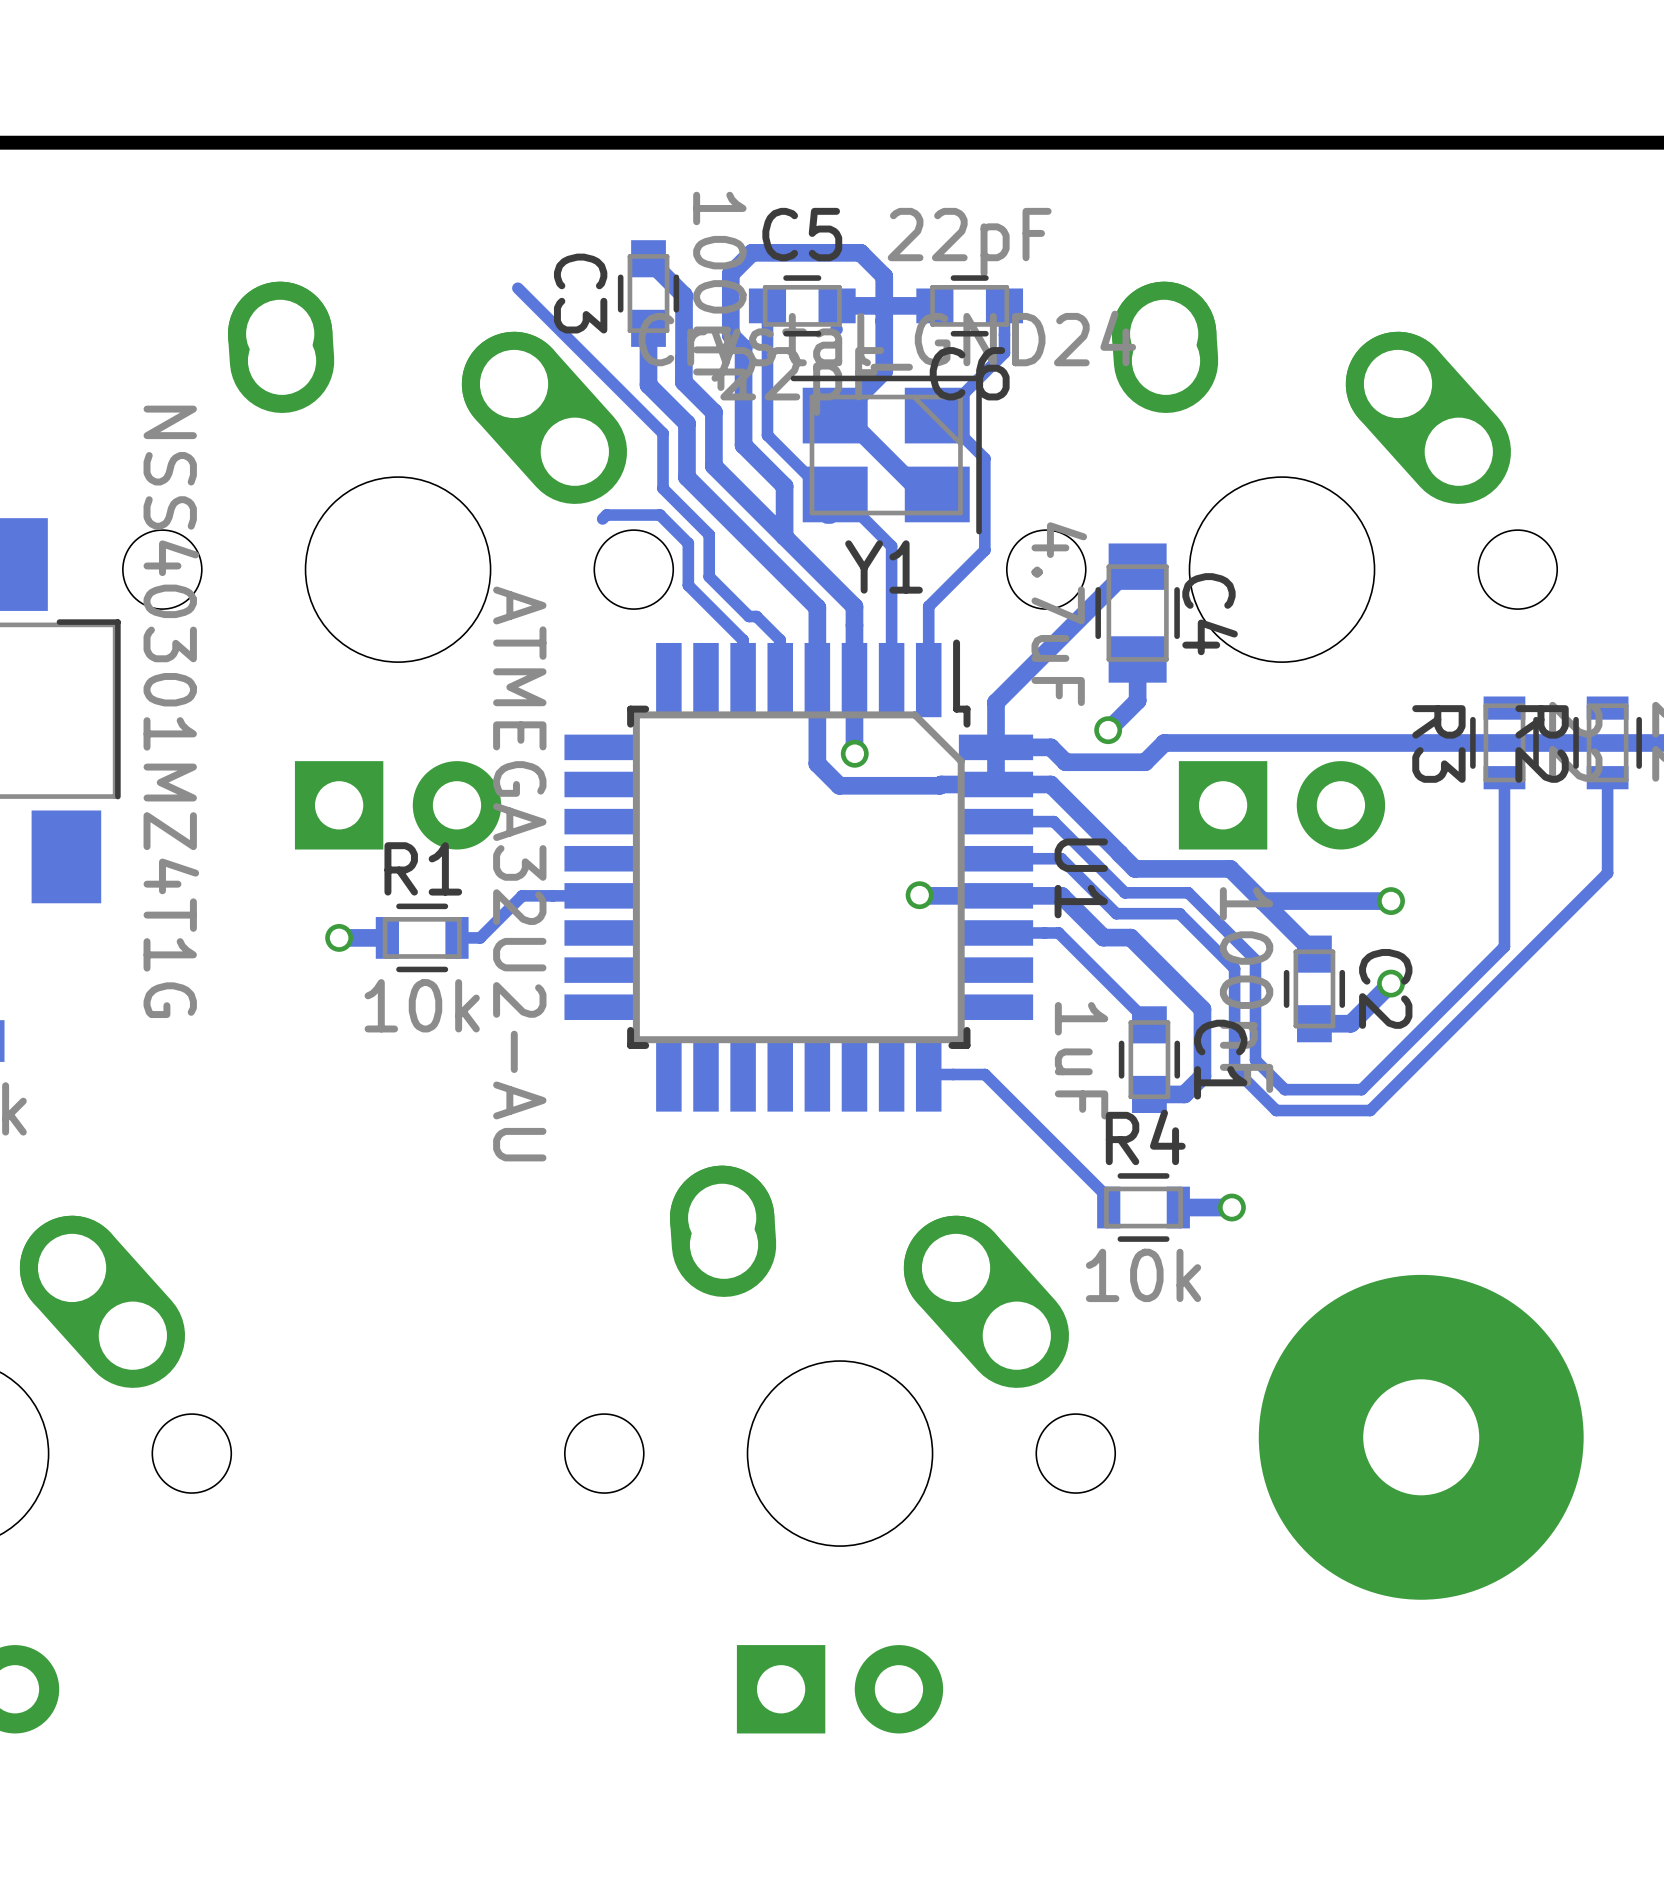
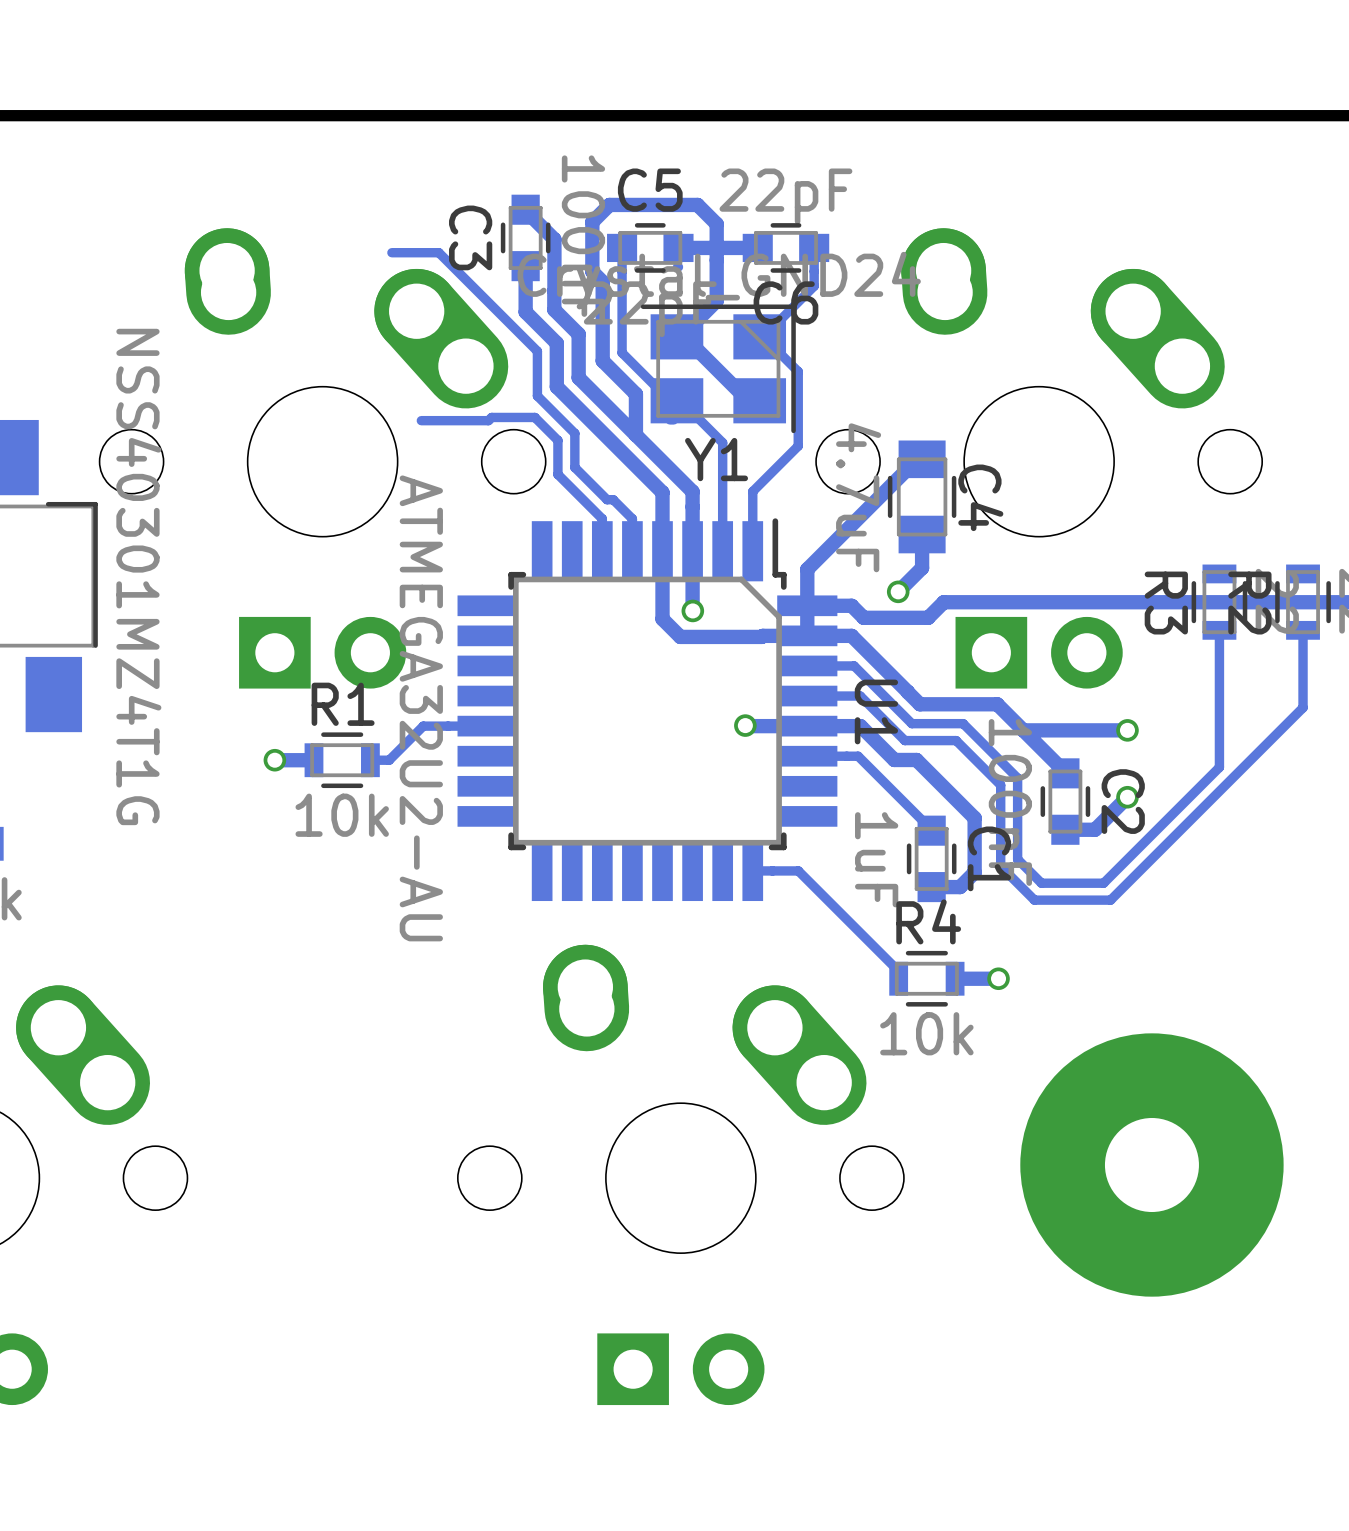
track: (517, 288) (541, 311) -> (391, 252) (438, 252)
track: none -> (488, 420) (421, 420)

